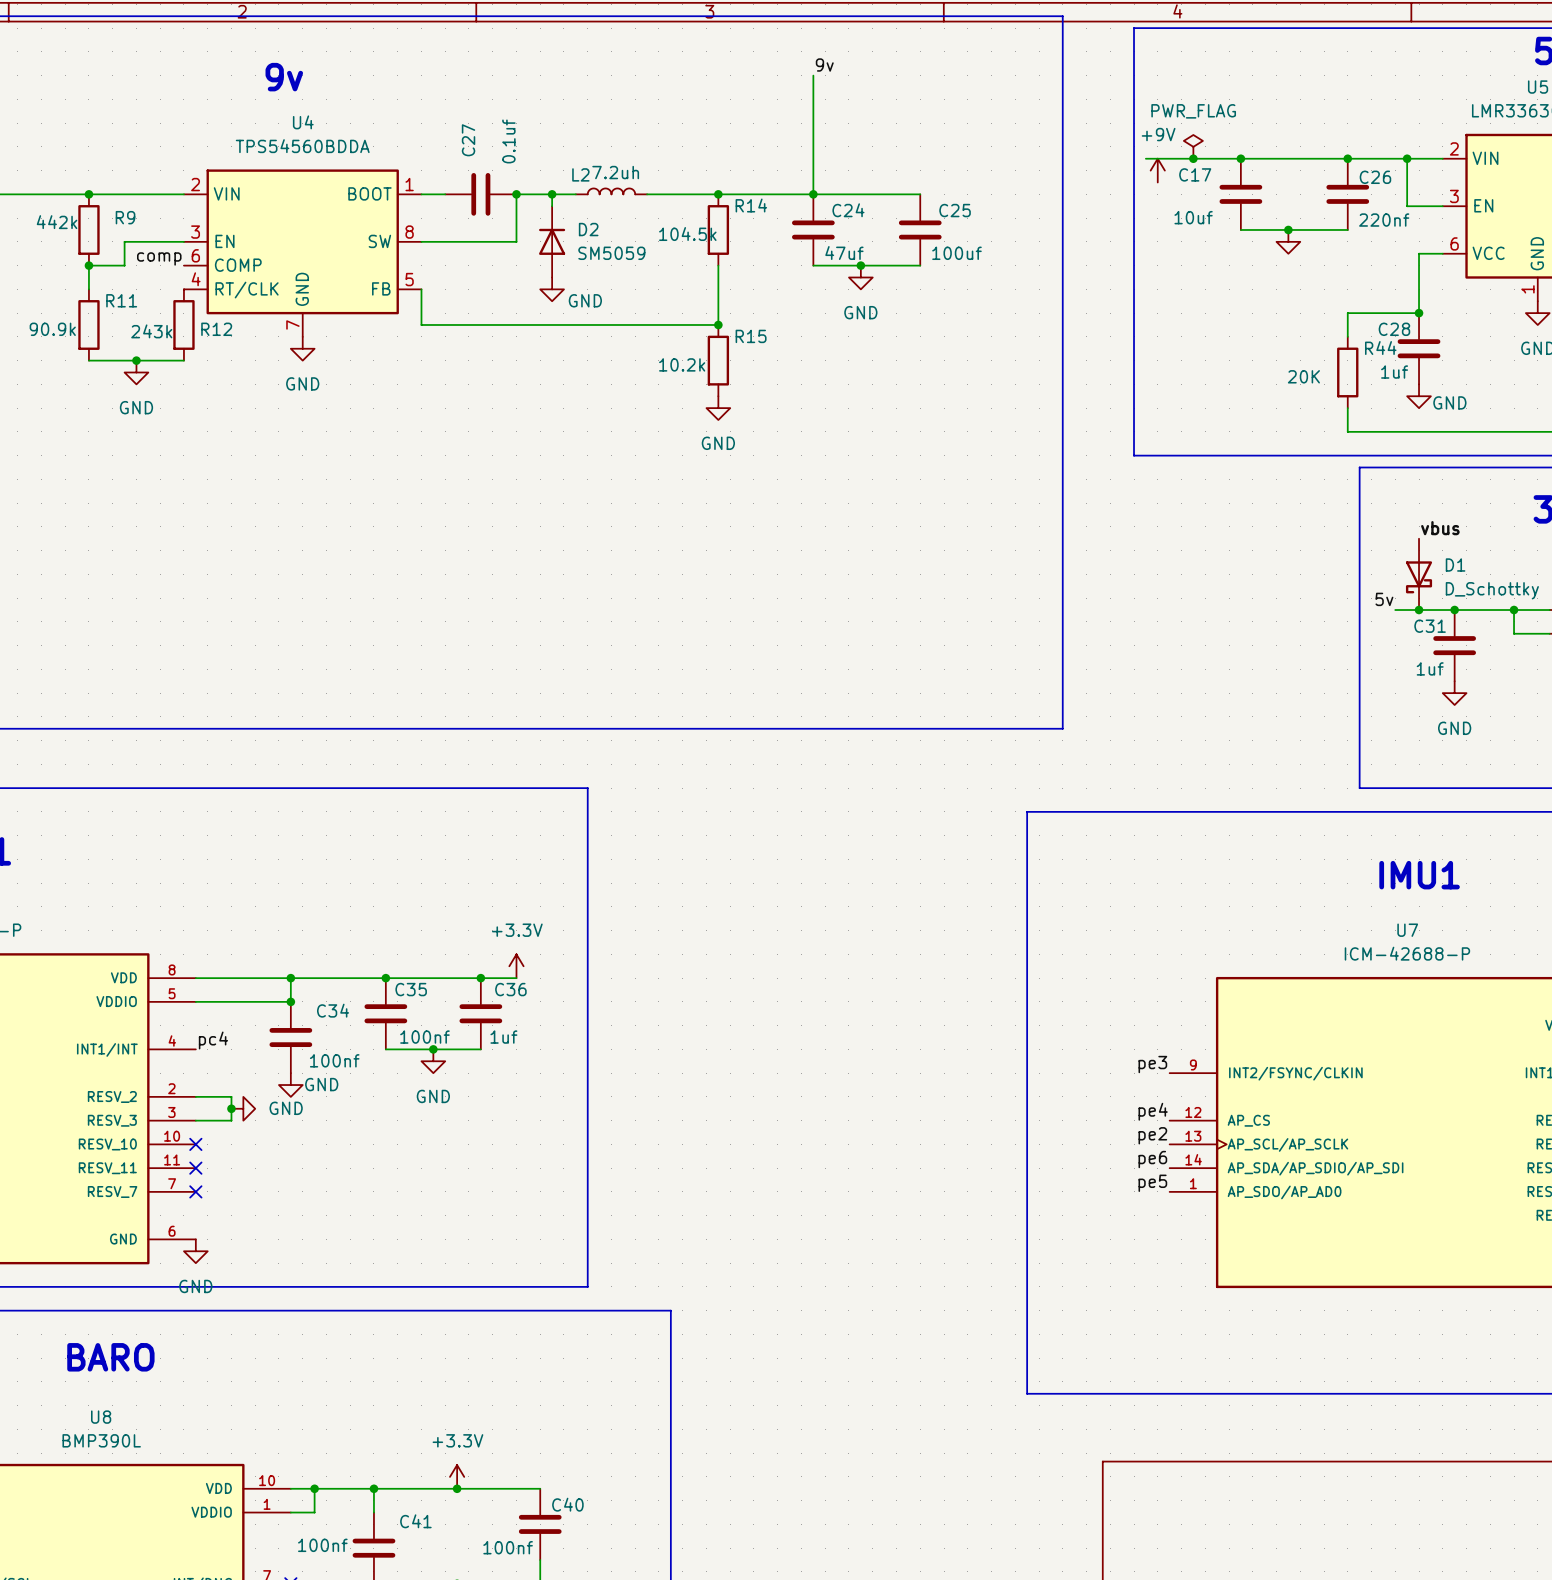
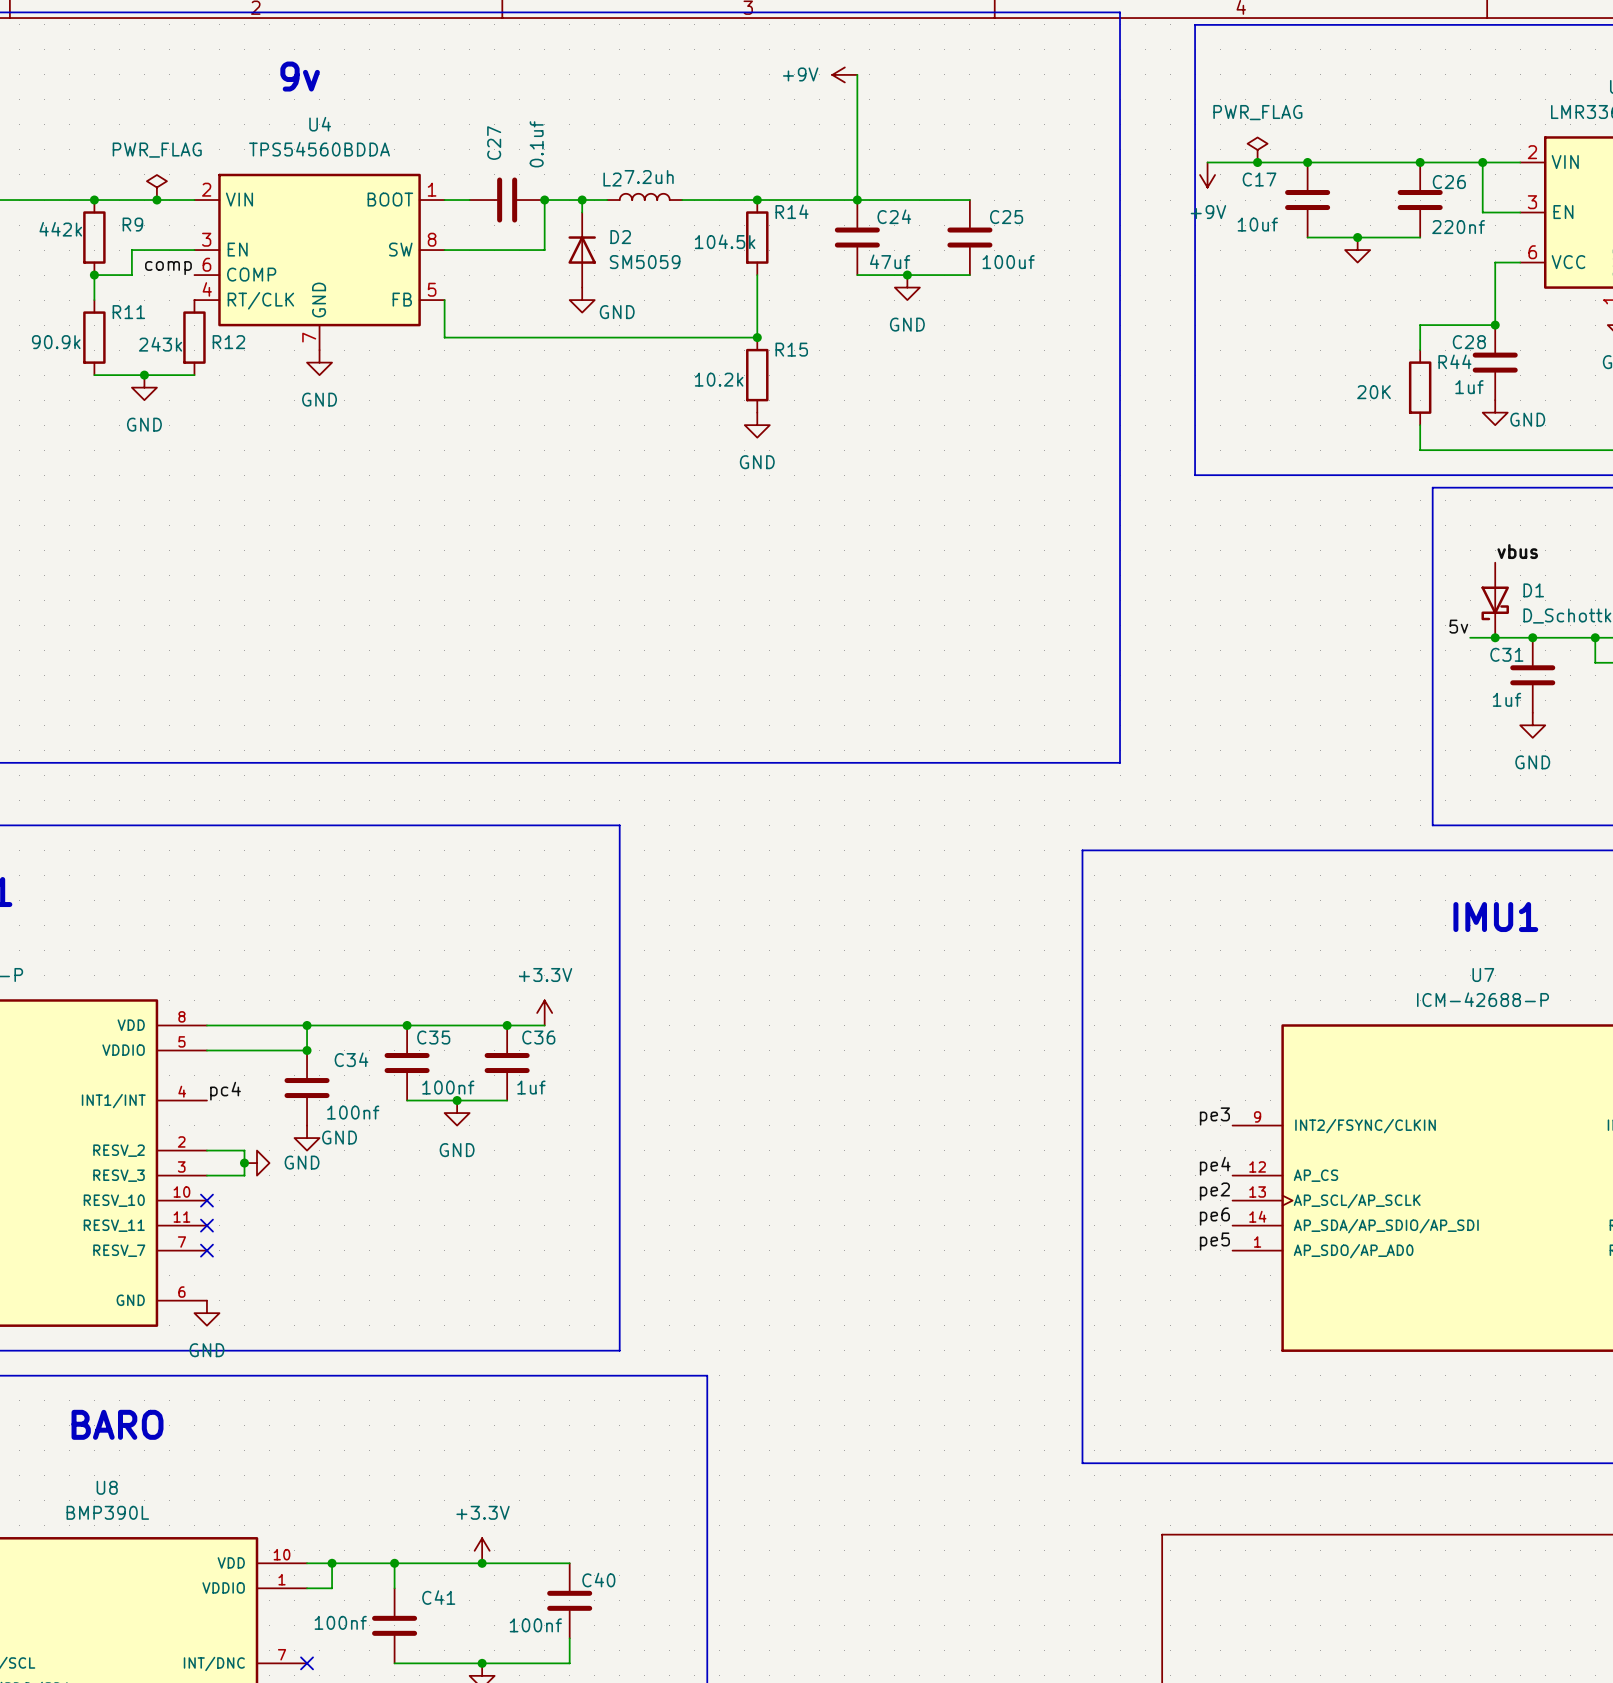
label: 9v (824, 65) -> none
power symbol: none -> +9V (844, 74)
power symbol rotation: 0° (1157, 170) -> 180° (1207, 174)
power symbol: none -> PWR_FLAG (156, 187)
junction: none -> (156, 200)

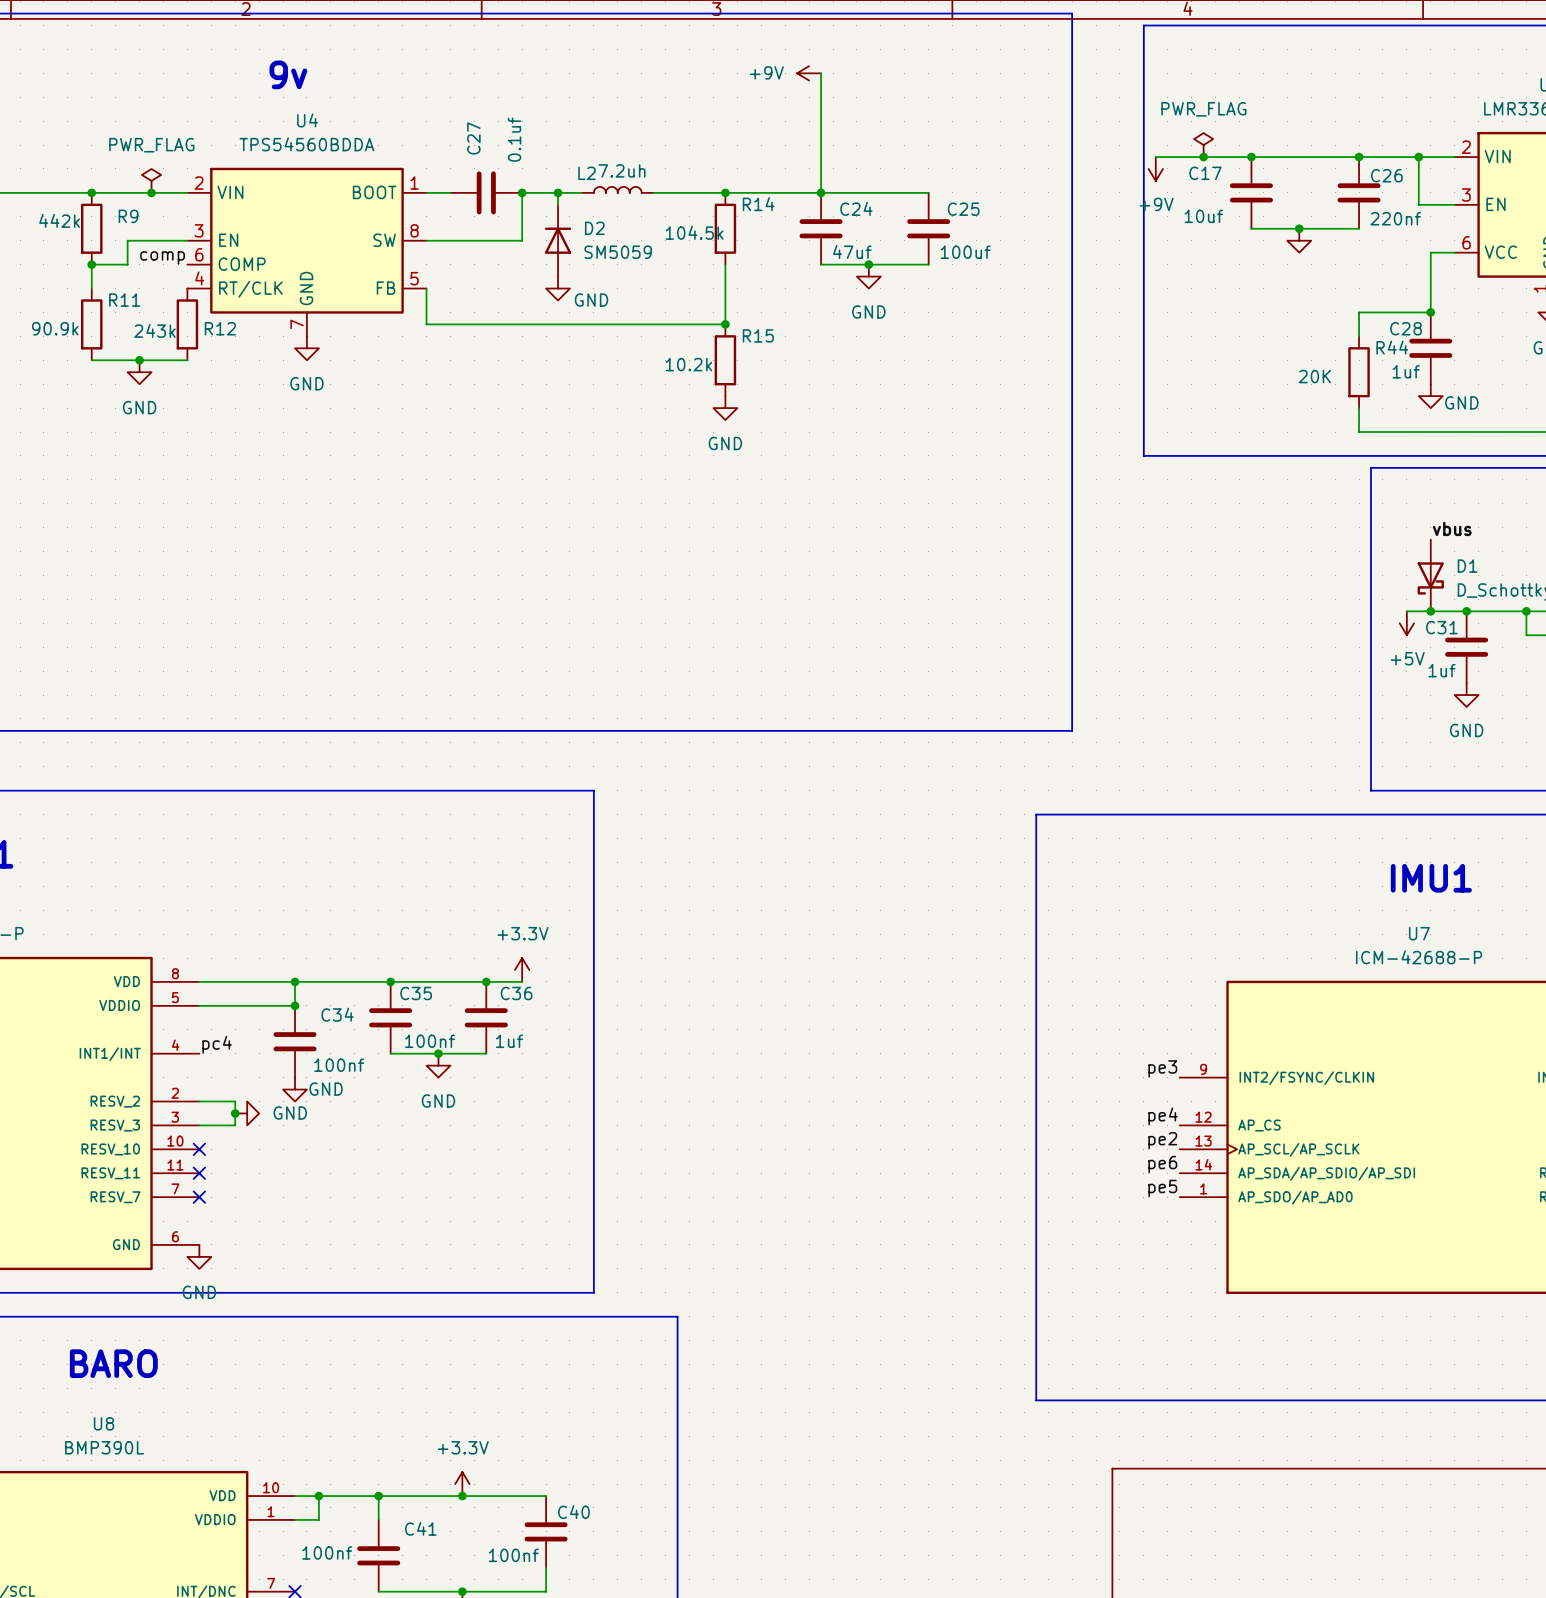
label: 5v (1458, 626) -> none
power symbol: none -> +5V (1406, 623)

